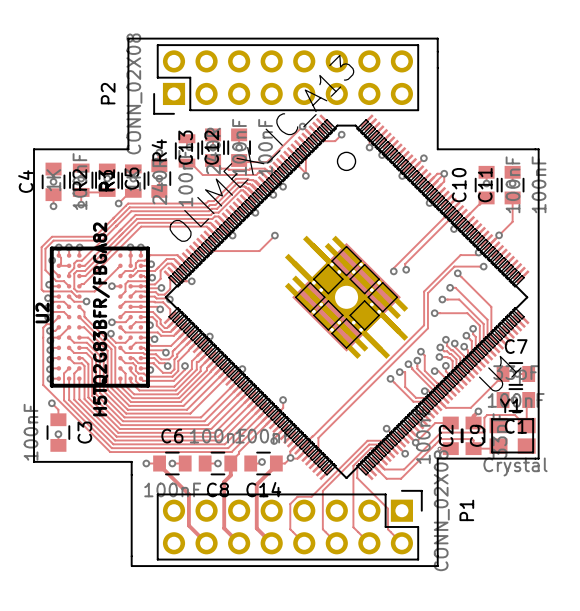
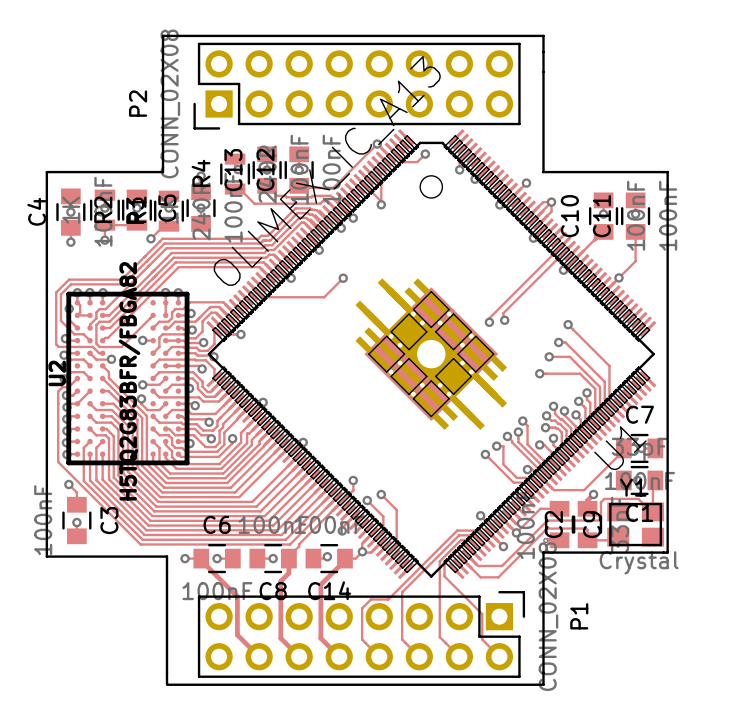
track: (478, 252) (476, 255) (460, 255) (424, 291) (424, 325) (307, 441) -> (367, 500) (383, 516) (383, 531)
via: (478, 252) -> none
track: (483, 266) (454, 266) (427, 293) (427, 328) (318, 437) -> (381, 494) (396, 509) (396, 527)
via: (483, 266) -> none
via: none -> (381, 494)
via: none -> (367, 500)

